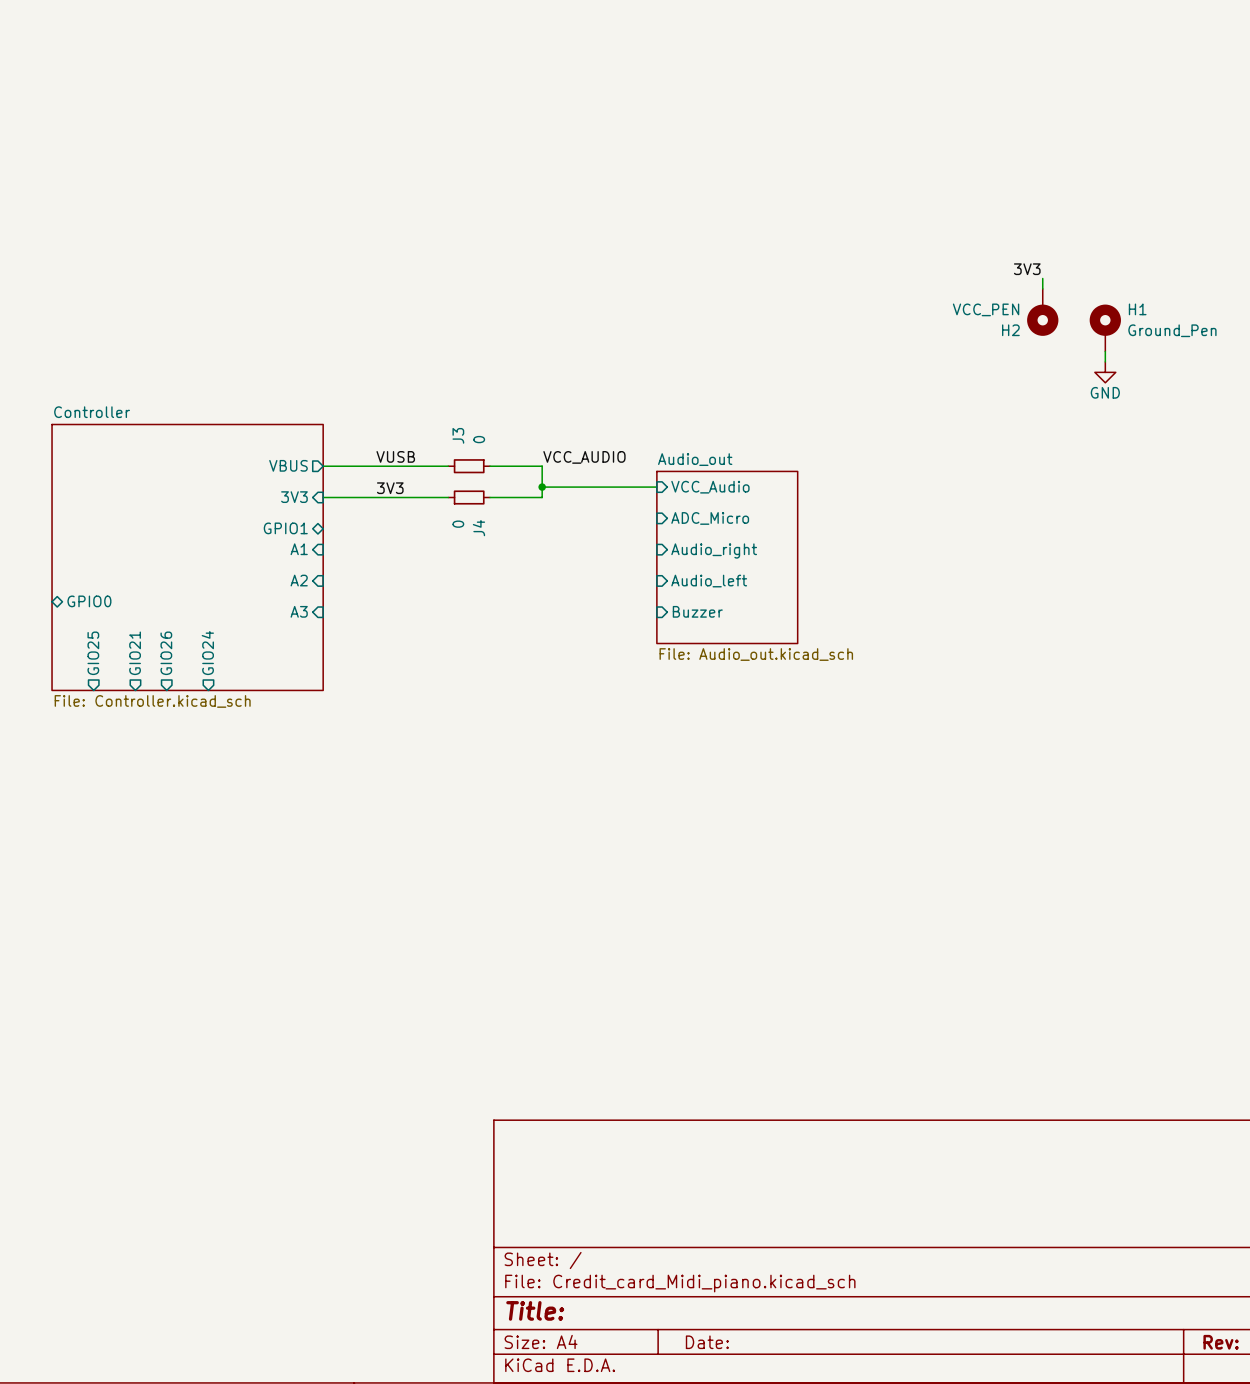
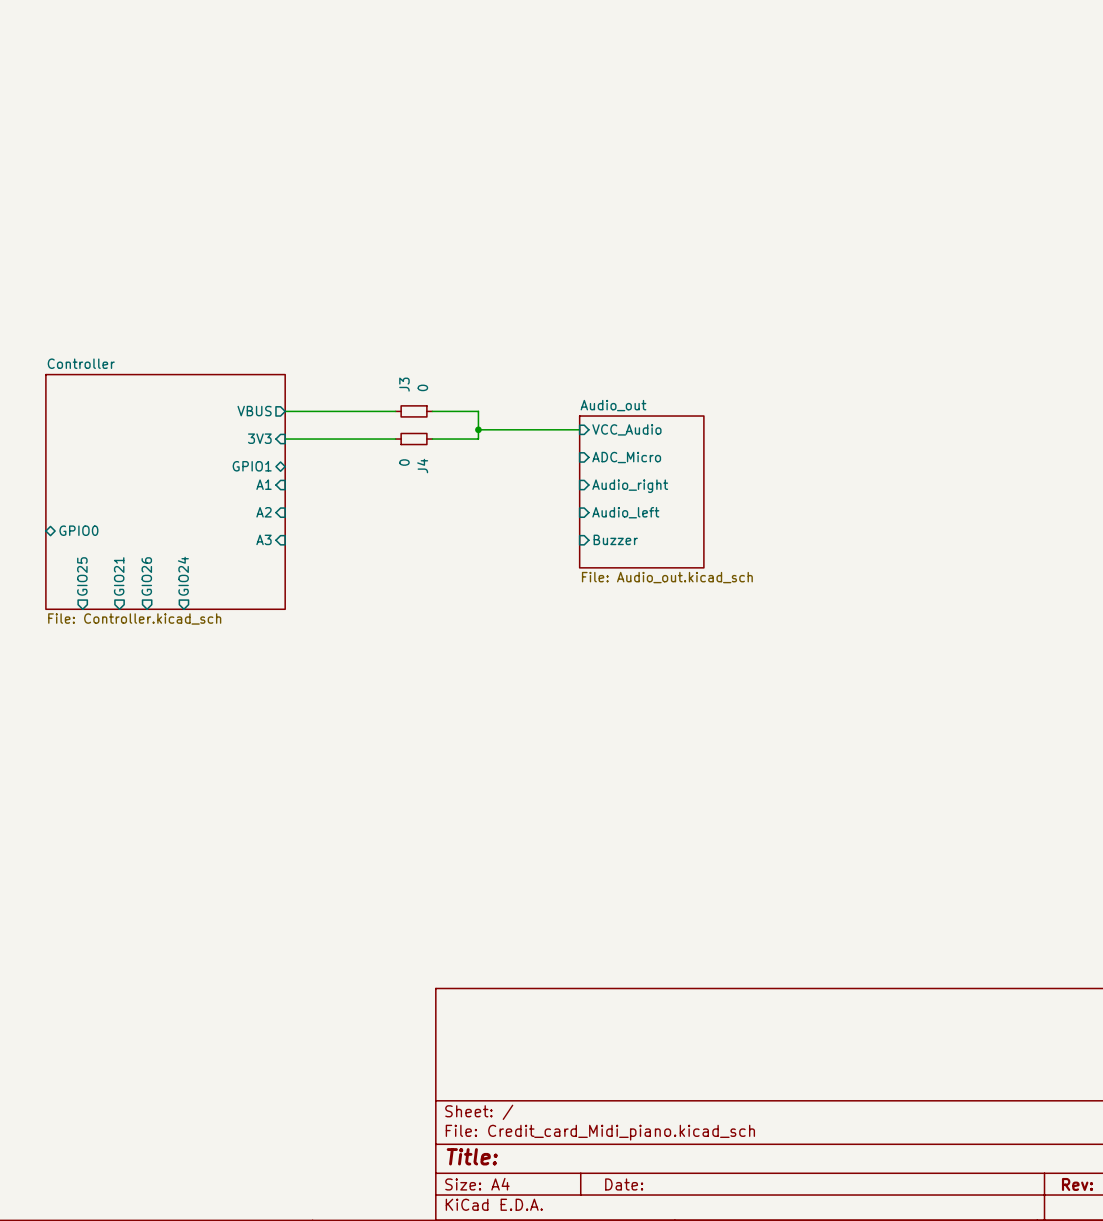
label: 3V3 (1027, 269) -> none
wire: (1042, 278) (1042, 288) -> none
H2: VCC_PEN (1042, 312) -> none
H1: Ground_Pen (1105, 328) -> none
wire: (1105, 351) (1105, 361) -> none
power symbol: GND (1105, 372) -> none
label: VUSB (395, 456) -> none
label: VCC_AUDIO (584, 457) -> none
label: 3V3 (390, 488) -> none

